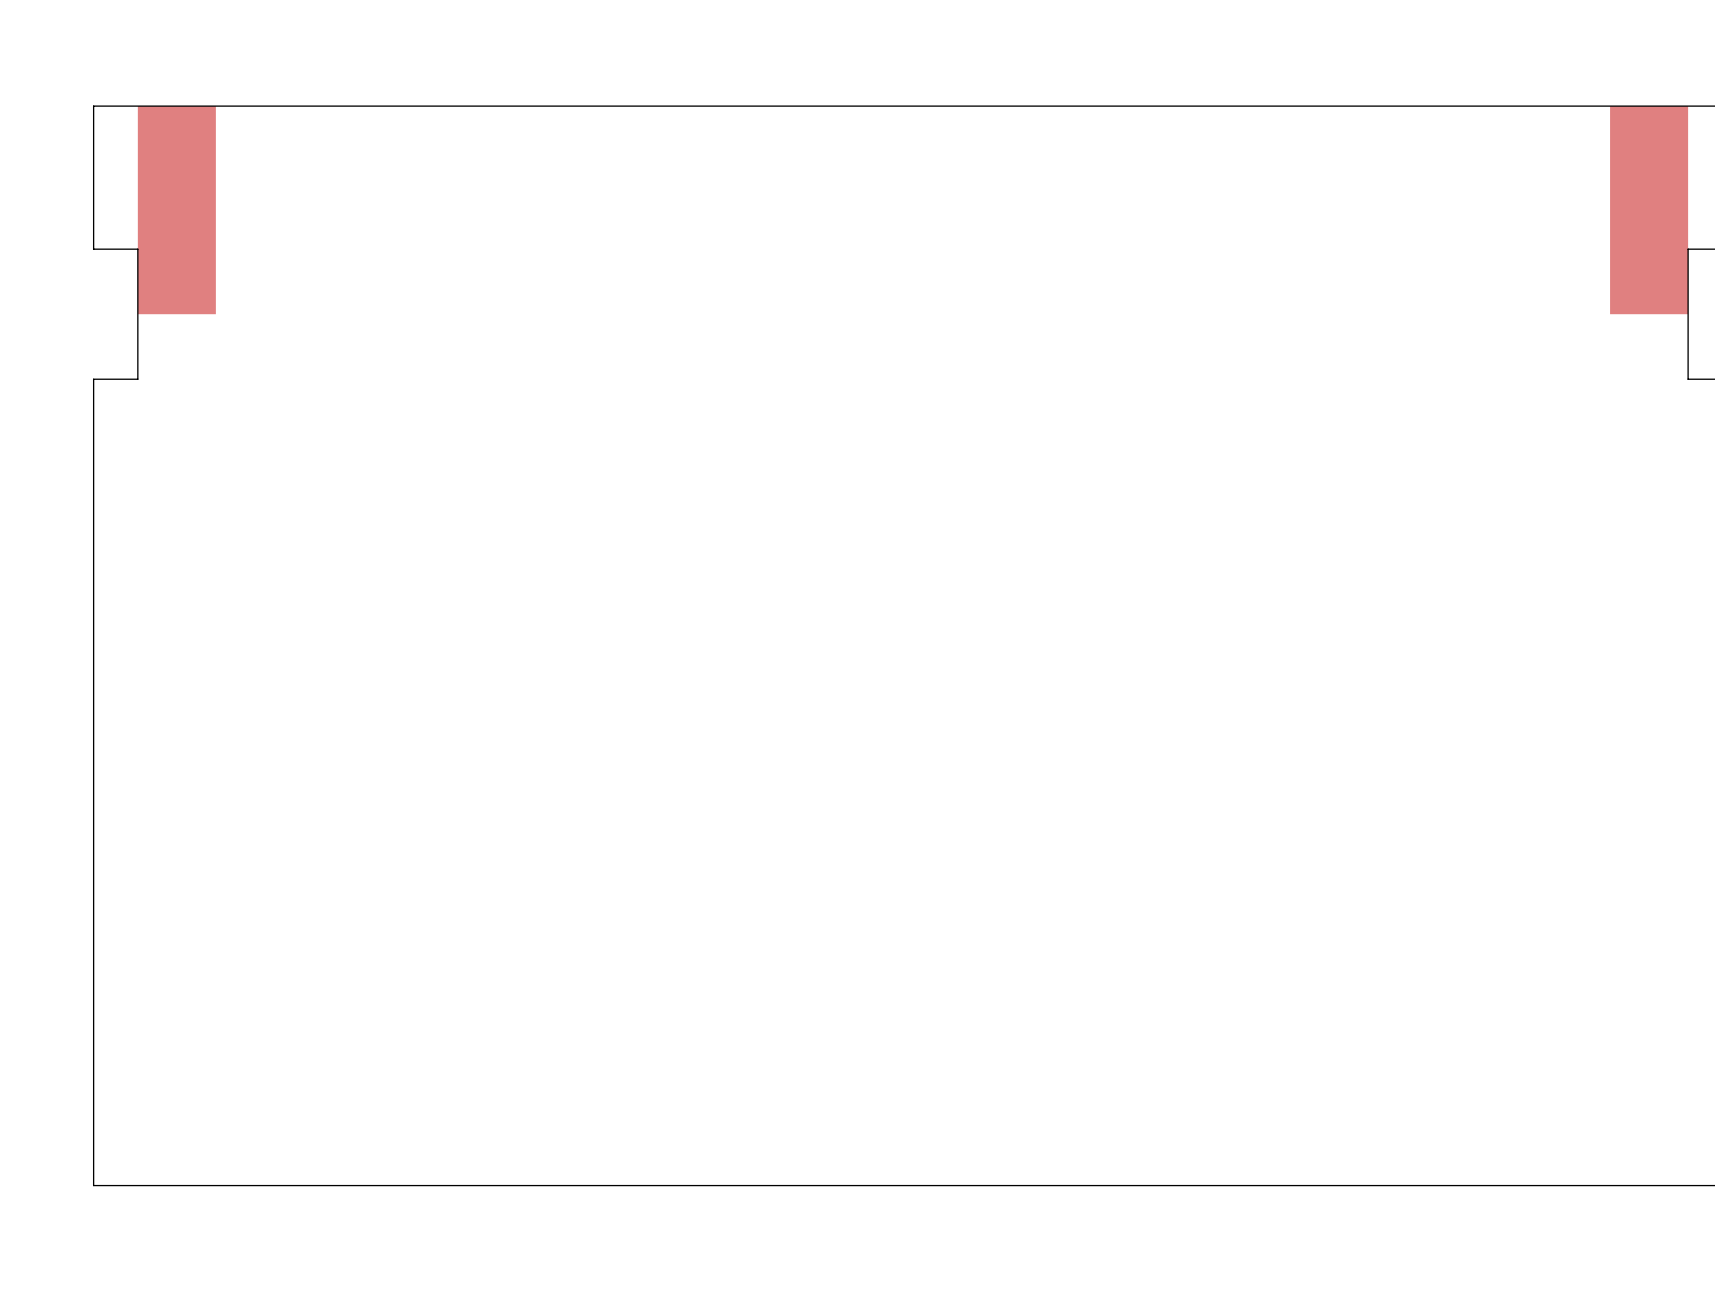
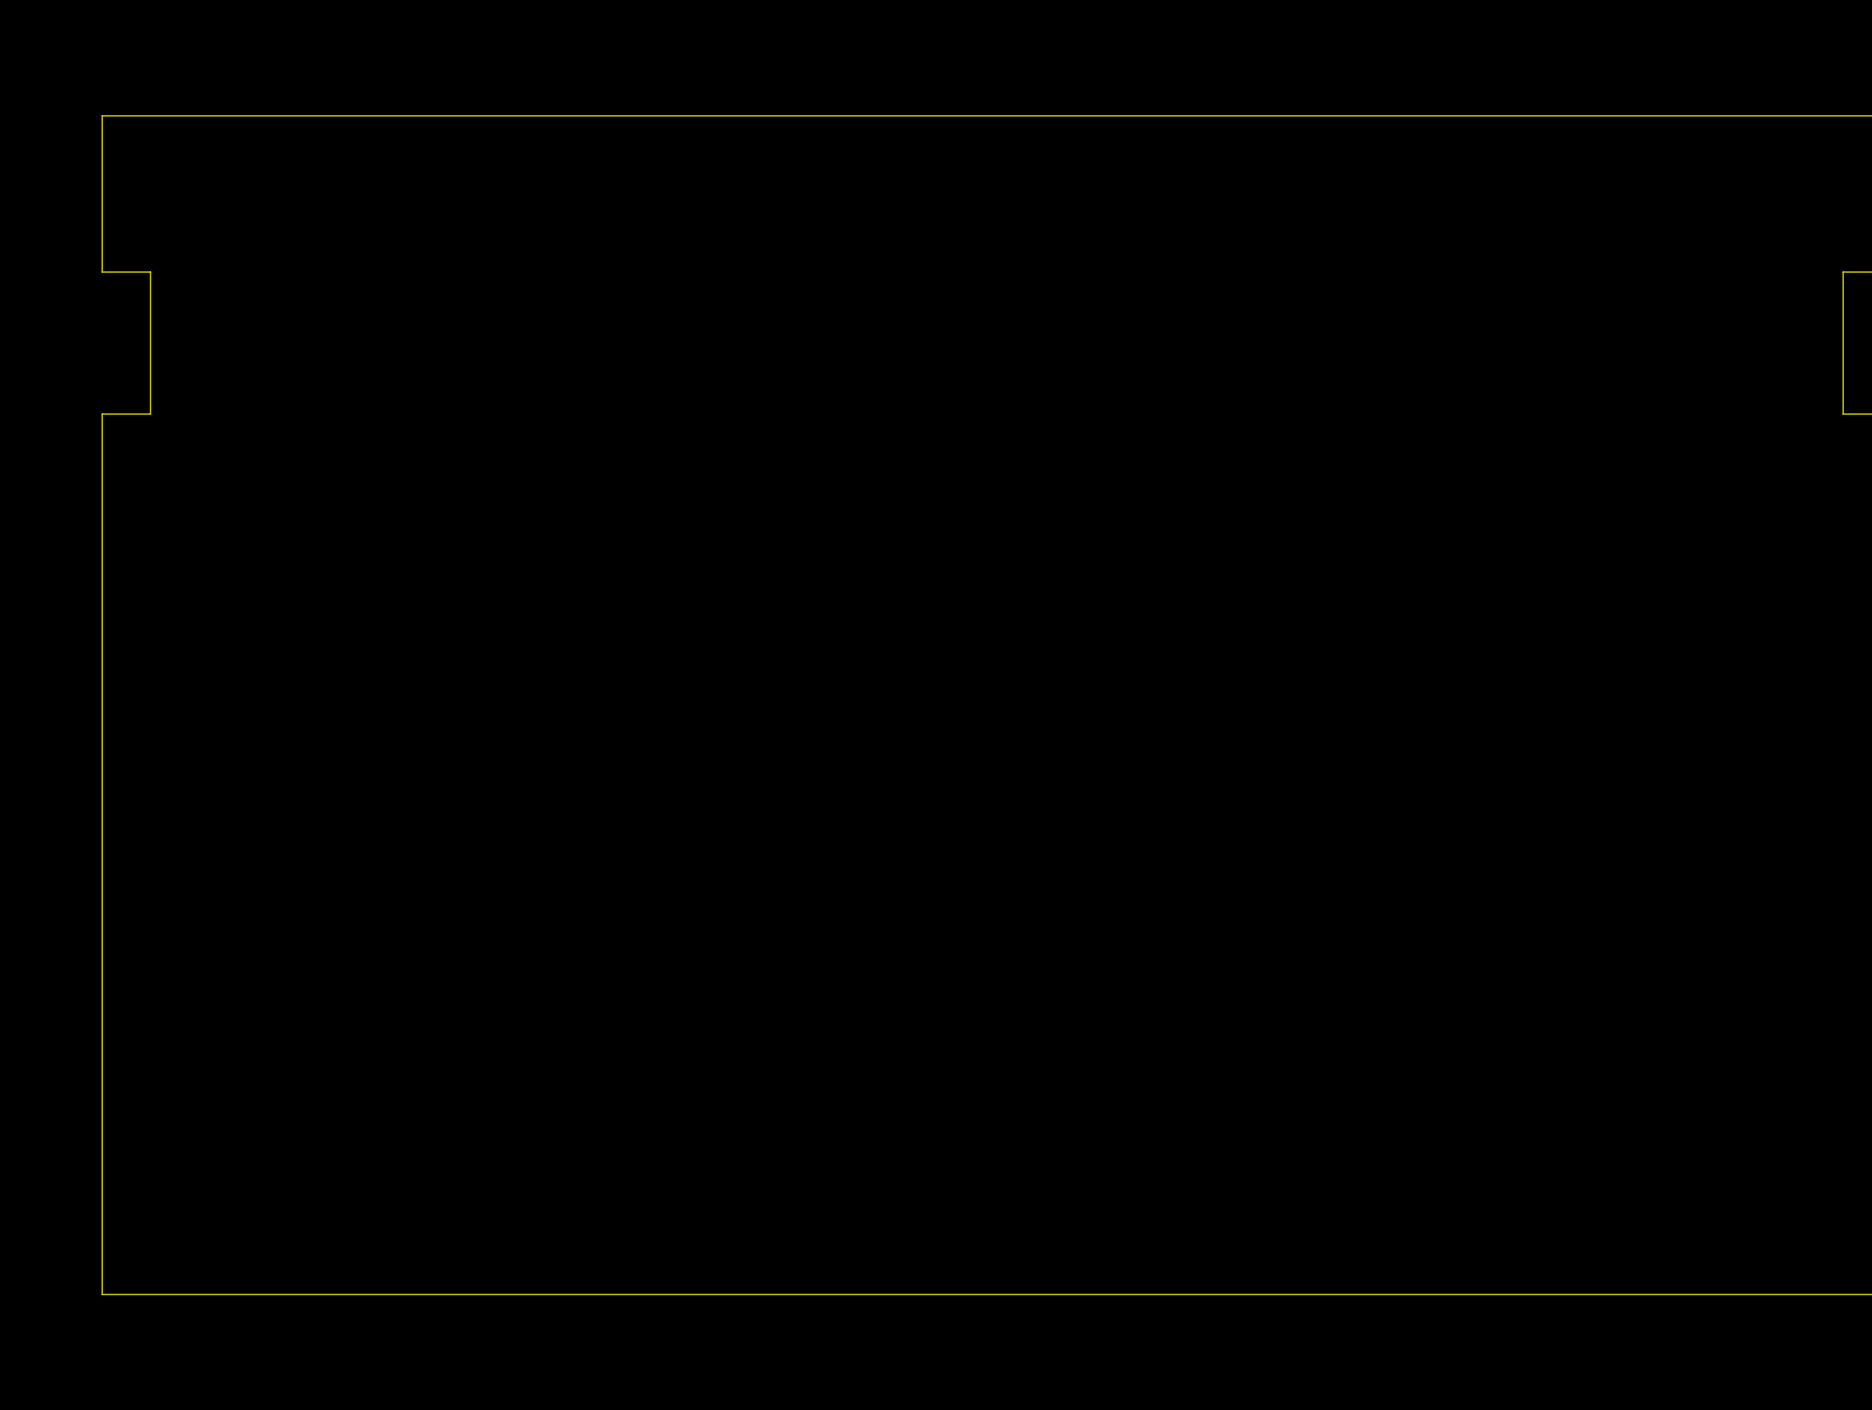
part: (176, 210) -> none
part: (1649, 210) -> none

